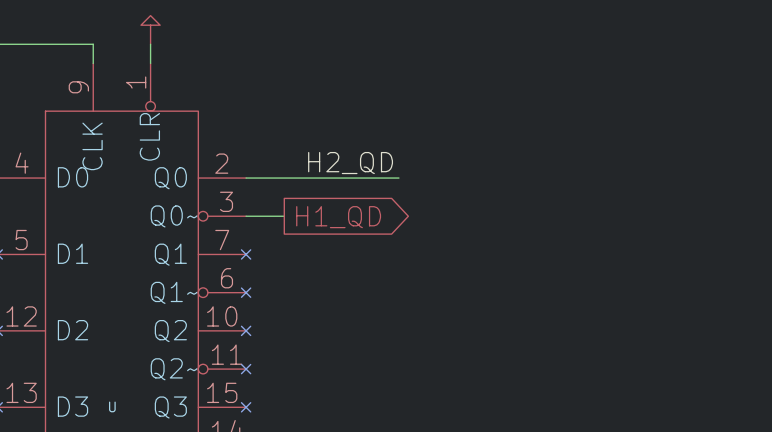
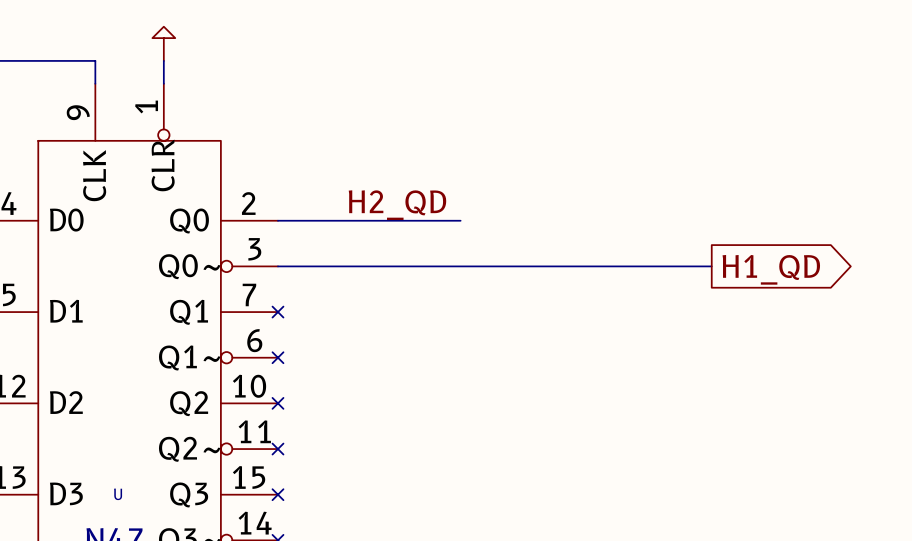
wire: none -> (323, 266) (711, 266)
global label: H1_QD (338, 217) -> none
global label: none -> H1_QD (771, 269)

